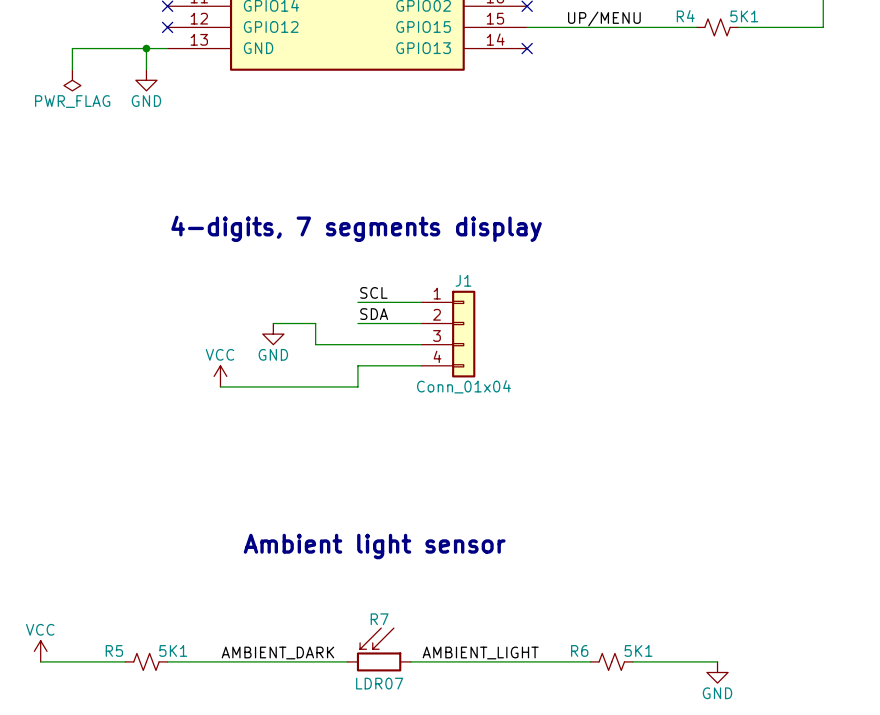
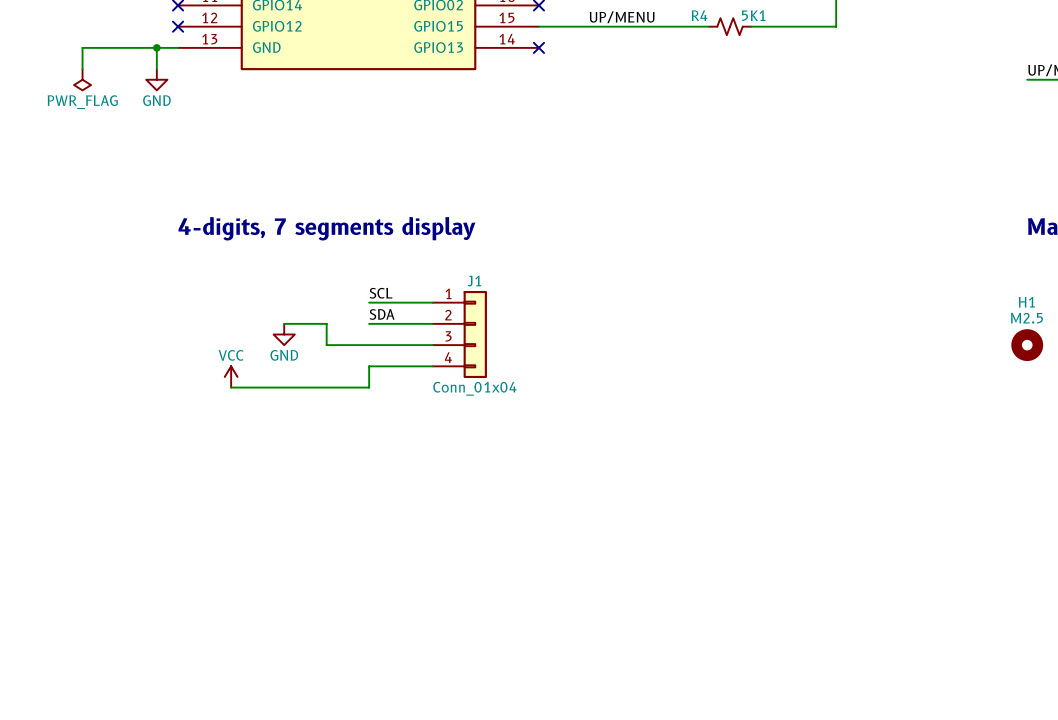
text: Ambient light sensor (374, 546) -> none
R7: LDR07 (379, 649) -> none
power symbol: VCC (40, 651) -> none
label: AMBIENT_DARK (277, 653) -> none
label: AMBIENT_LIGHT (480, 653) -> none
wire: (40, 661) (125, 661) -> none
R5: 5K1 (146, 661) -> none
wire: (167, 661) (347, 661) -> none
wire: (410, 661) (590, 661) -> none
R6: 5K1 (611, 661) -> none
wire: (632, 661) (717, 661) -> none
power symbol: GND (717, 672) -> none

